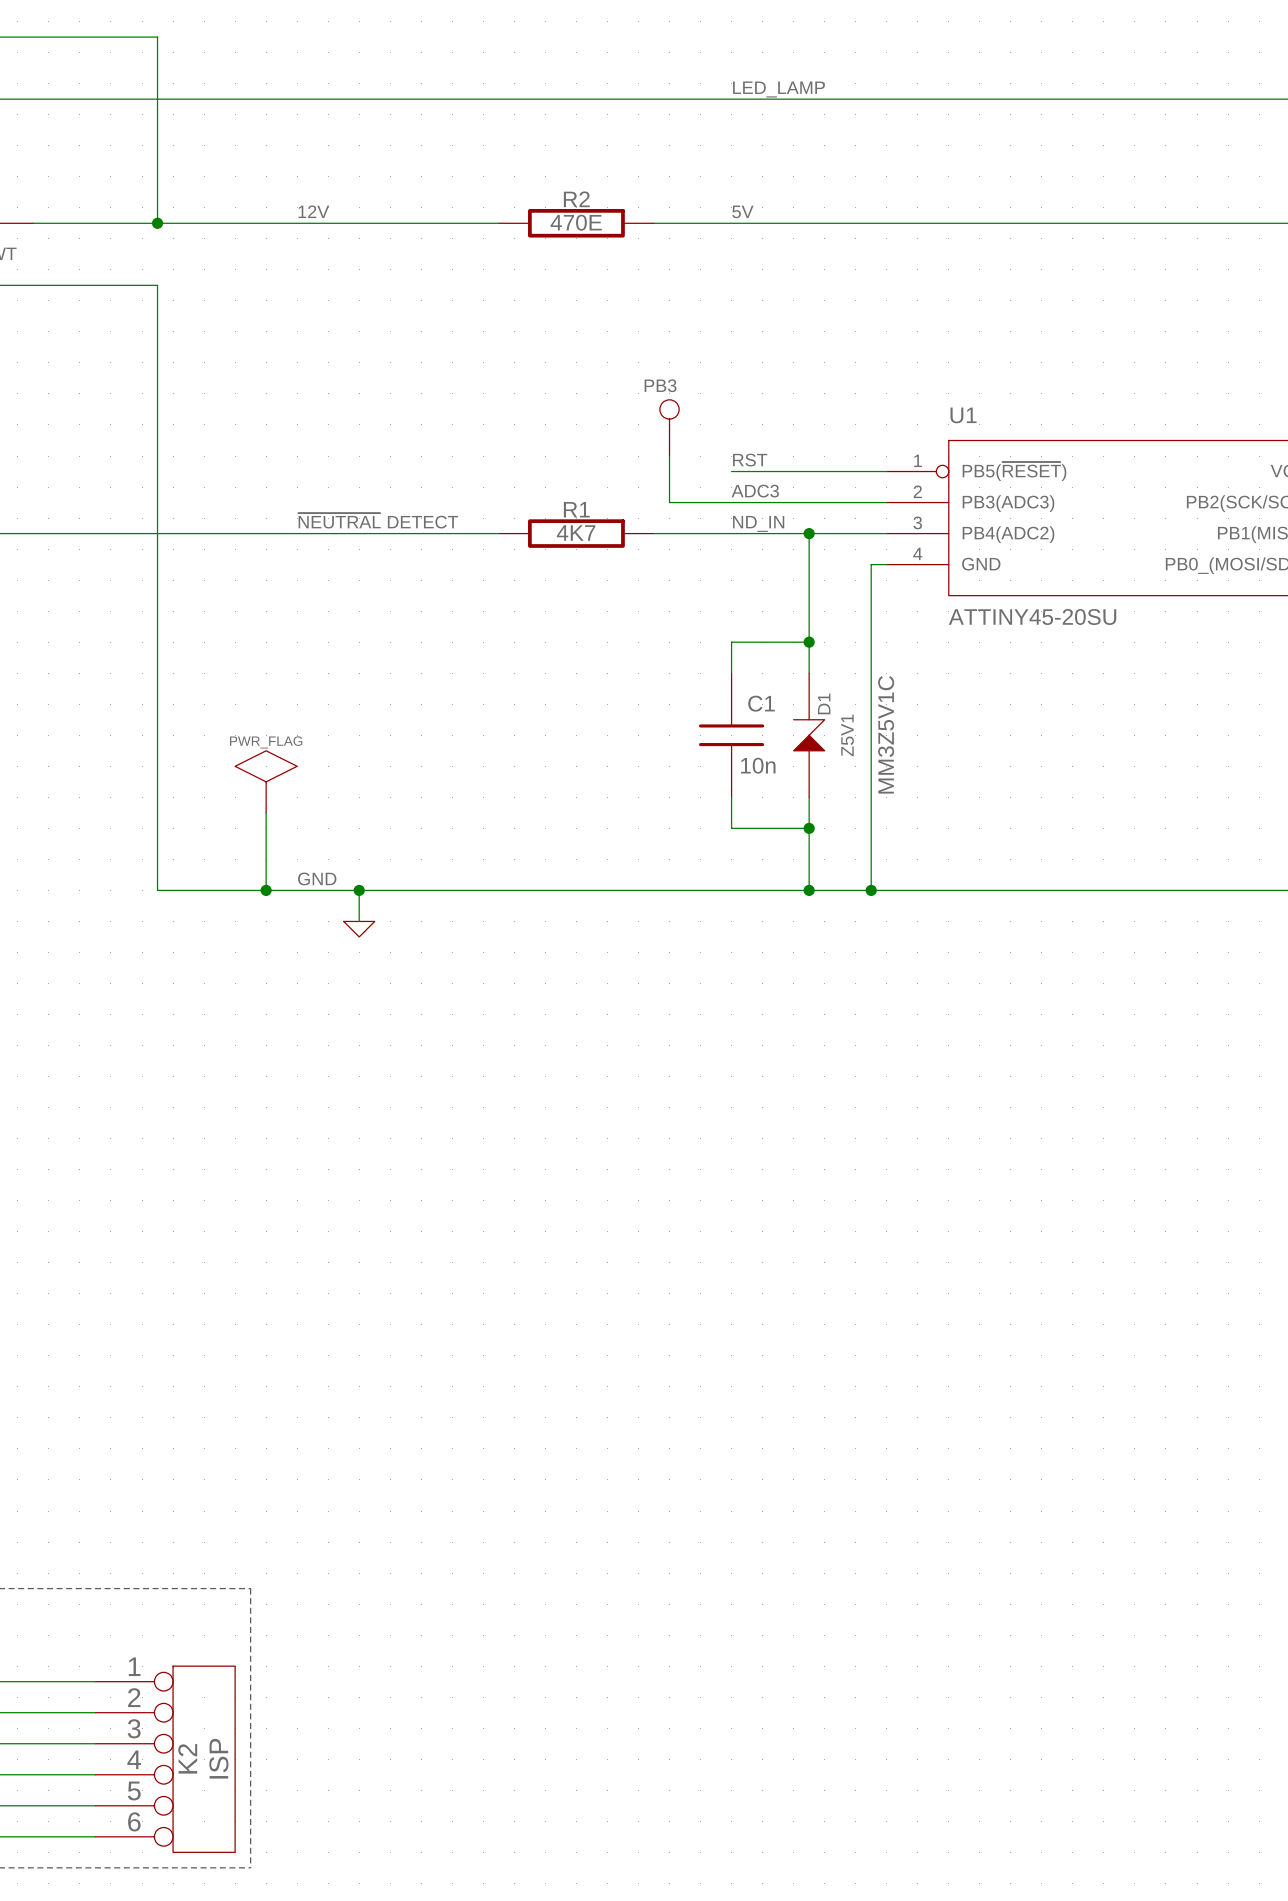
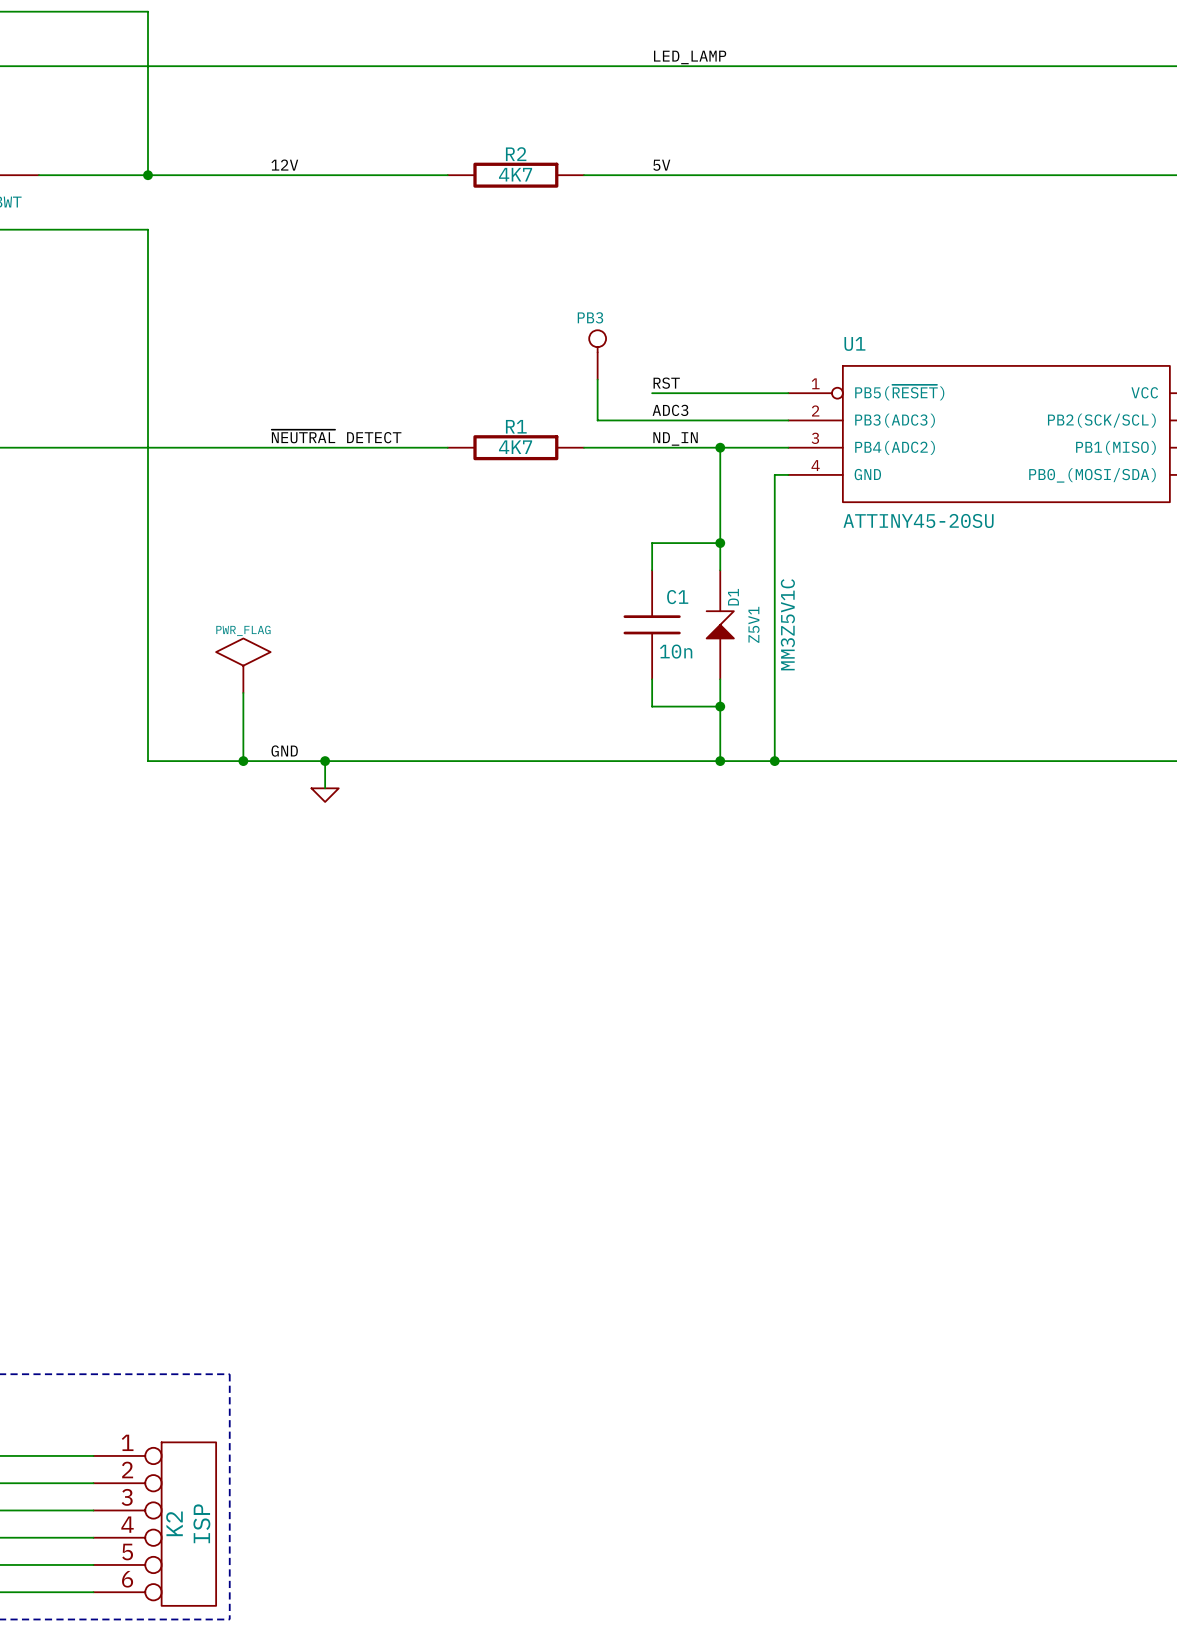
R2 value: 470E (576, 222) -> 4K7 (515, 174)

